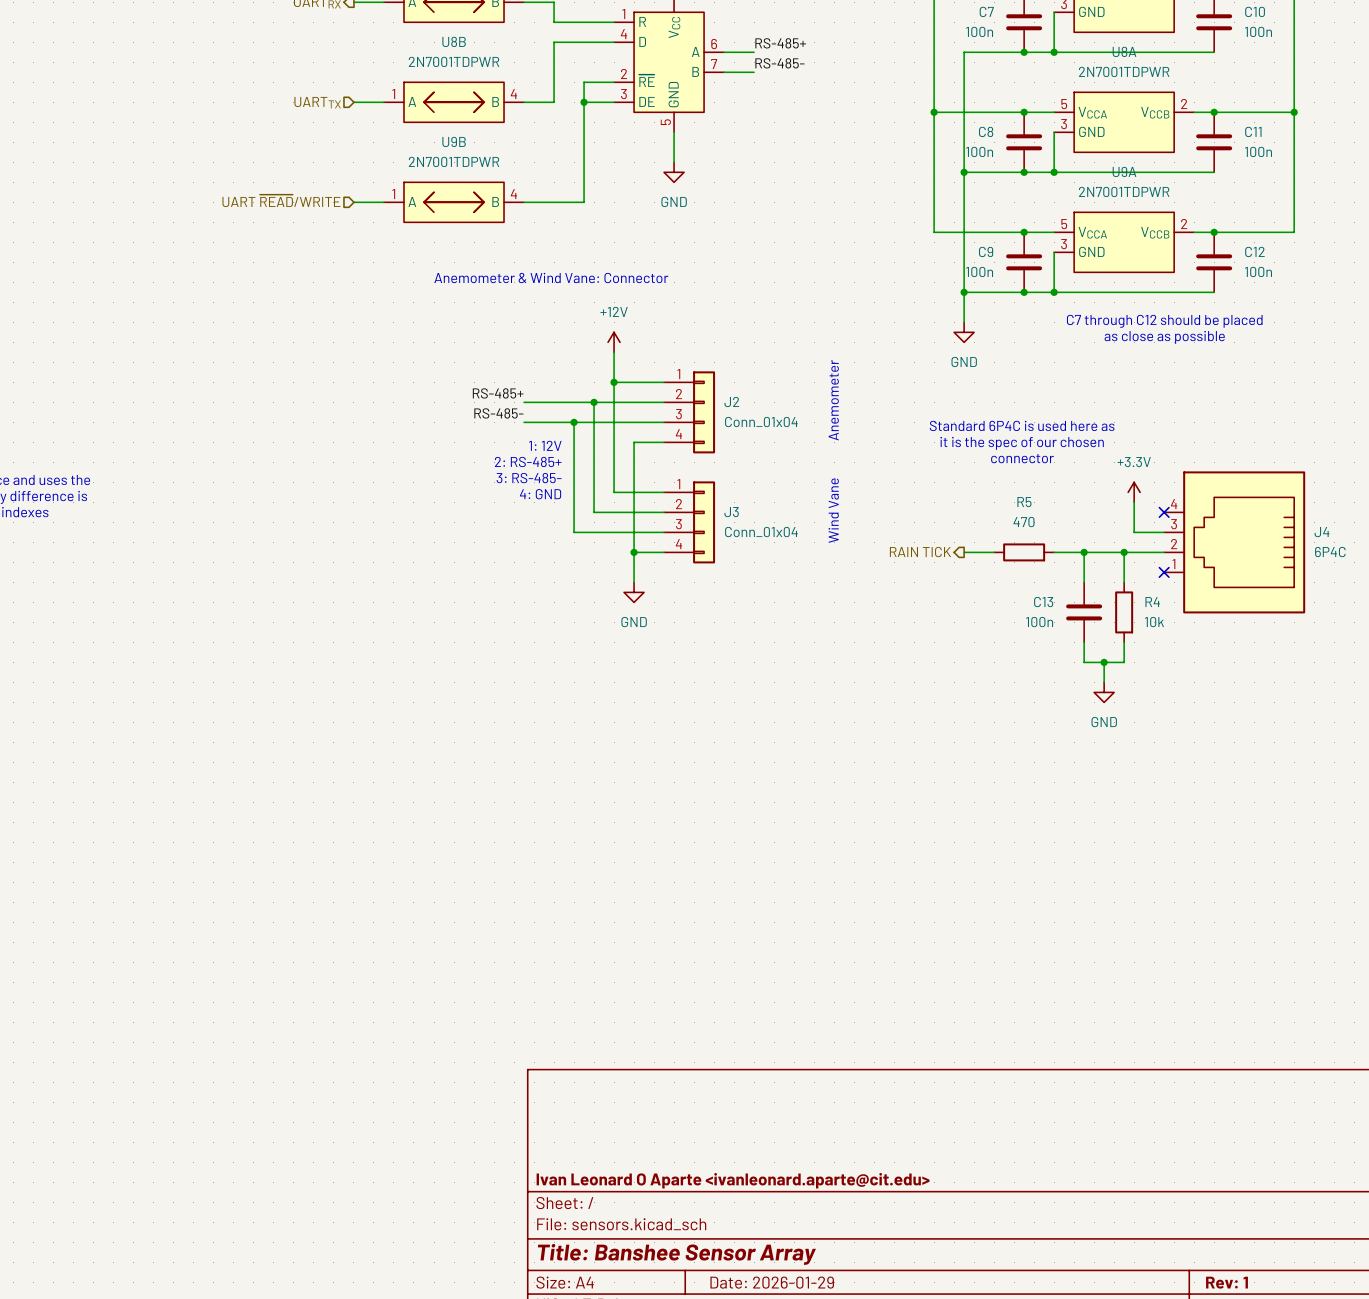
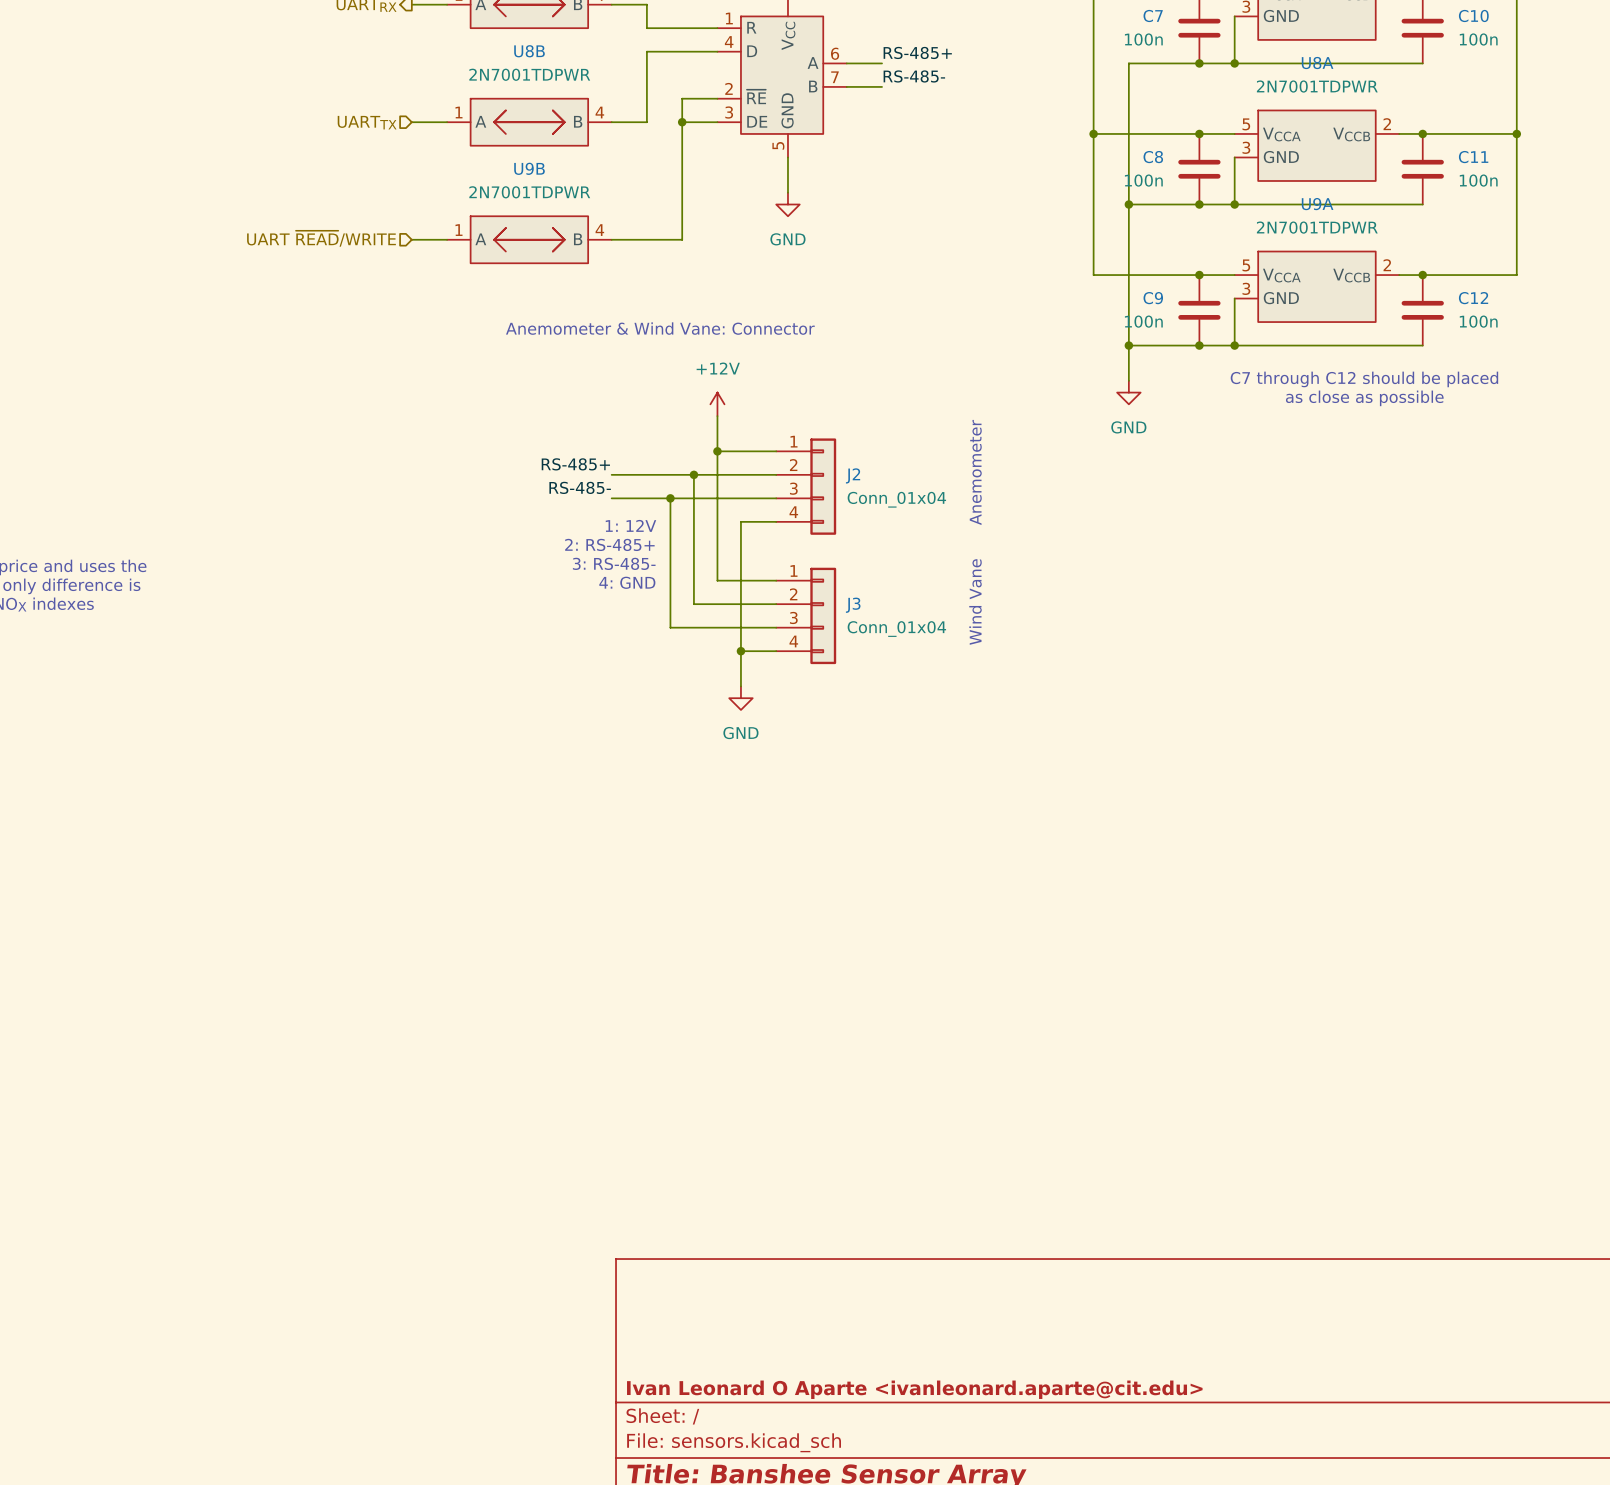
text: Standard 6P4C is used here as (1022, 425) -> none
text: it is the spec of our chosen (1022, 443) -> none
text: connector (1022, 458) -> none
power symbol: +3.3V (1134, 492) -> none
wire: (1134, 502) (1134, 532) (1164, 532) -> none
no-connect mark: (1164, 512) -> none
J4: 6P4C (1234, 542) -> none
hierarchical label: RAIN TICK (920, 552) -> none
wire: (964, 552) (994, 552) -> none
R5: 470 (1024, 552) -> none
wire: (1054, 552) (1164, 552) -> none
wire: (1084, 552) (1084, 582) -> none
junction: (1084, 552) -> none
wire: (1124, 552) (1124, 582) -> none
junction: (1124, 552) -> none
no-connect mark: (1164, 572) -> none
C13: 100n (1084, 612) -> none
R4: 10k (1124, 612) -> none
wire: (1084, 642) (1084, 662) (1124, 662) (1124, 642) -> none
wire: (1104, 662) (1104, 682) -> none
junction: (1104, 662) -> none
power symbol: GND (1104, 692) -> none

